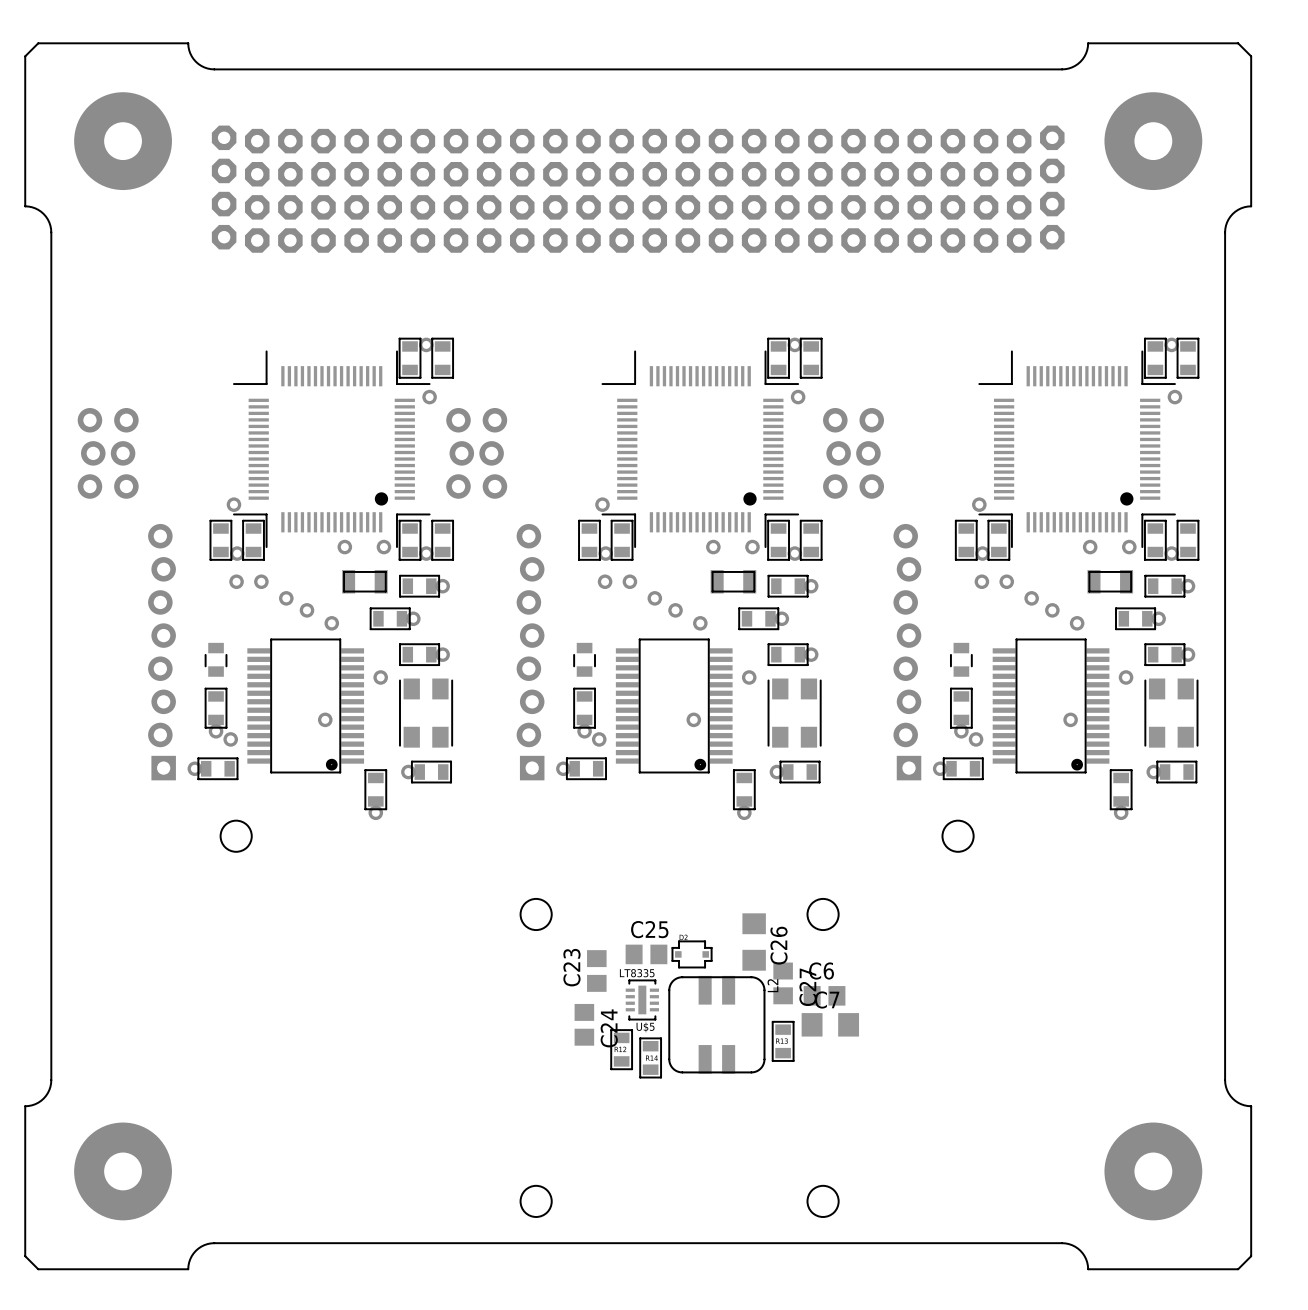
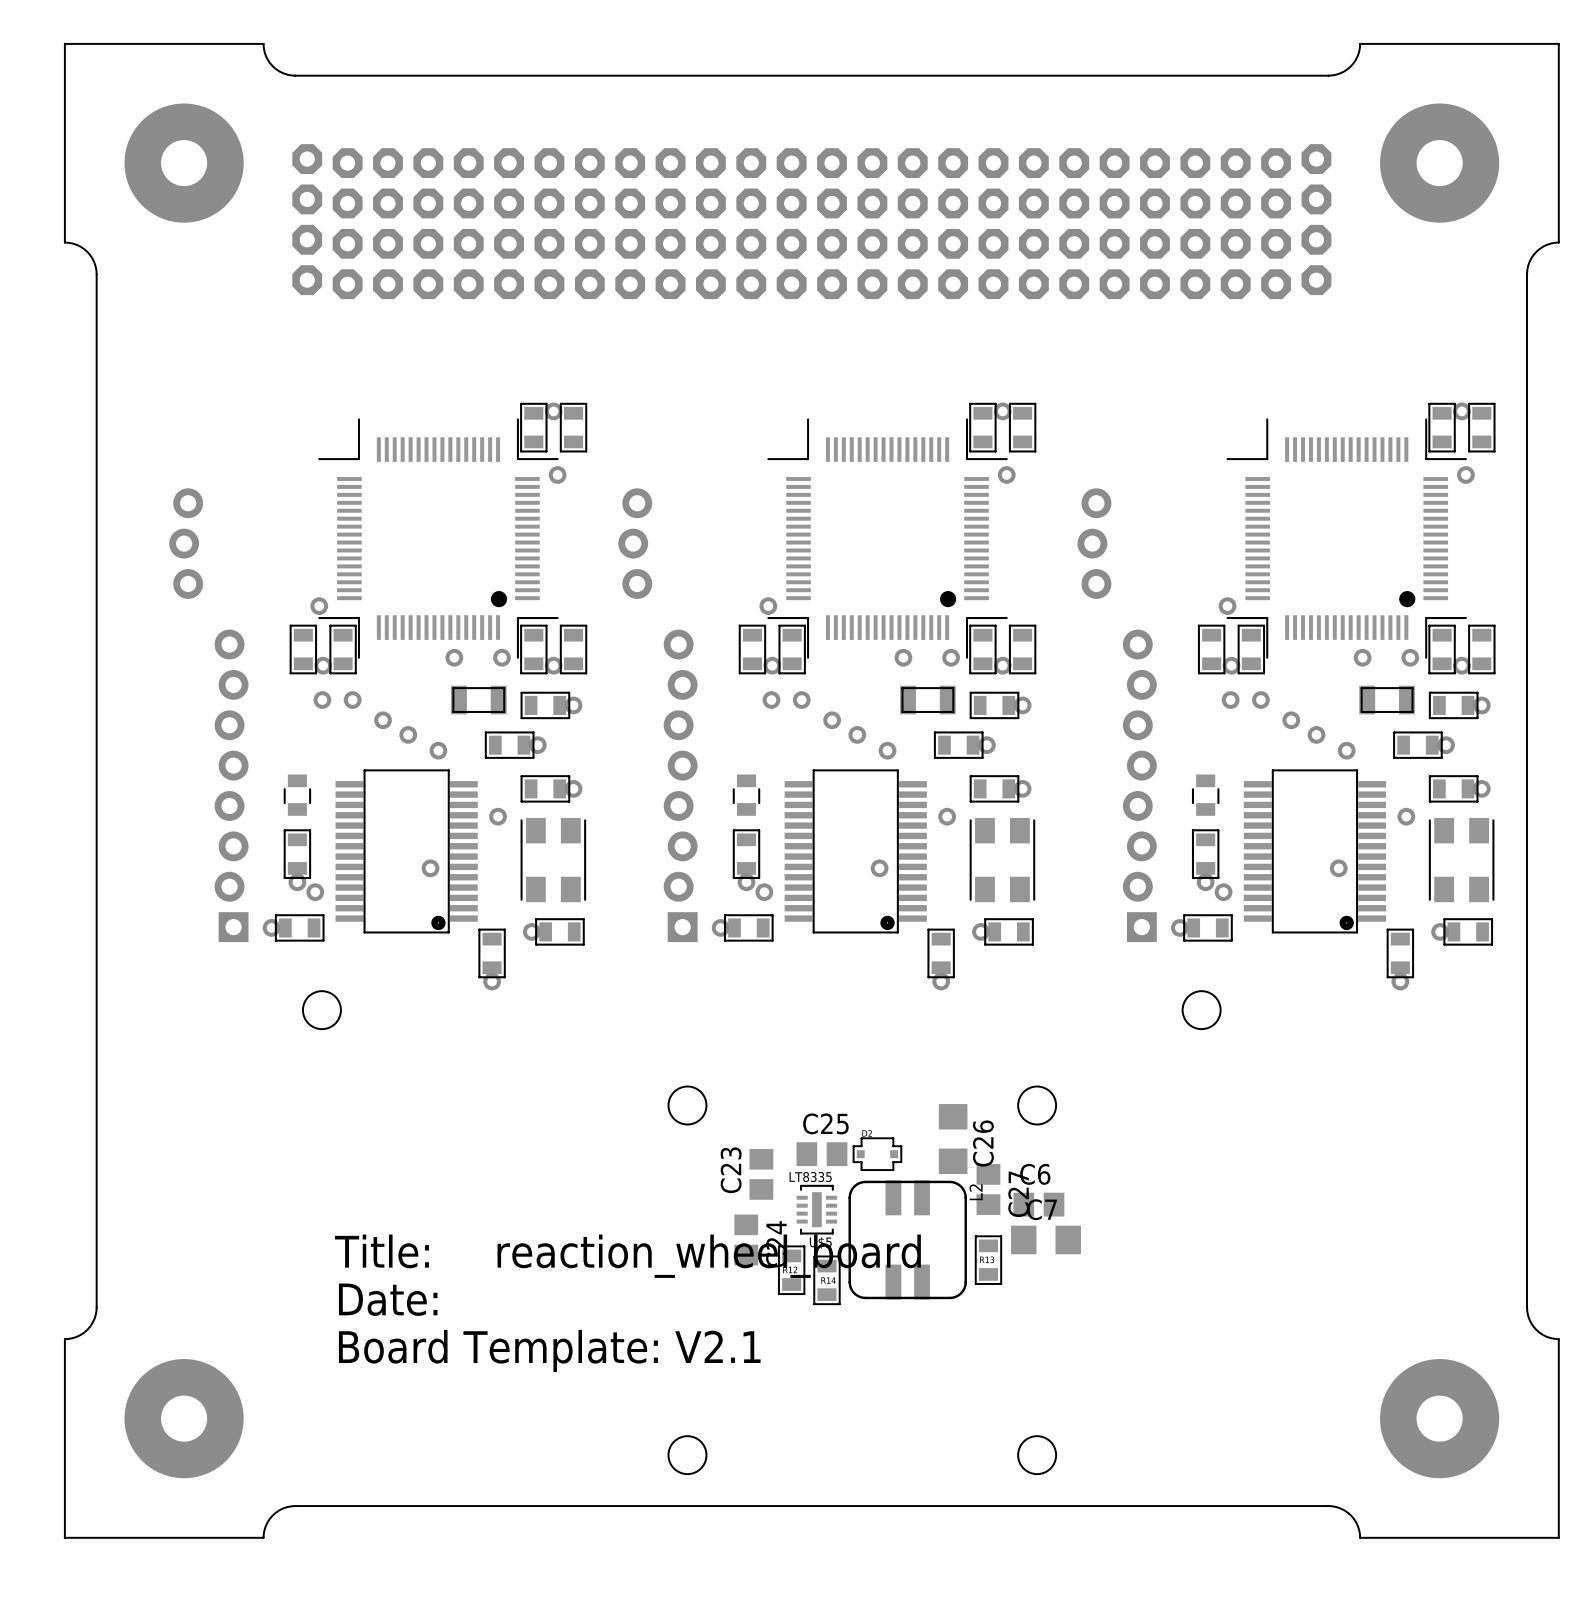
part footprint: [25, 43, 1252, 1270] -> [64, 43, 1559, 1538]
part: (91, 453) -> none
part: (460, 453) -> none
part: (836, 453) -> none
part text: none -> reaction_wheel_board (709, 1256)

